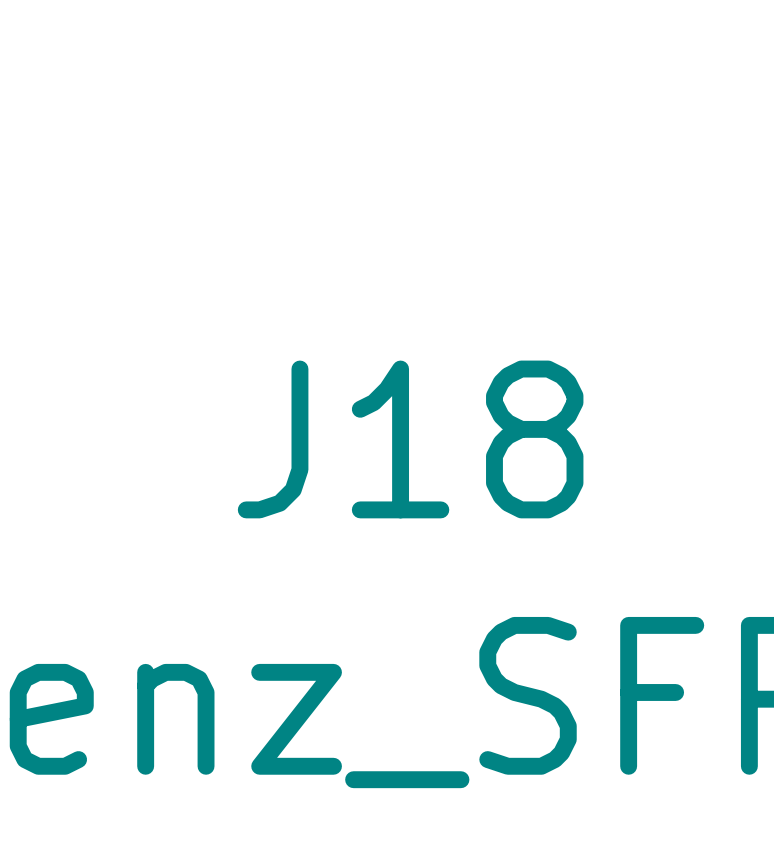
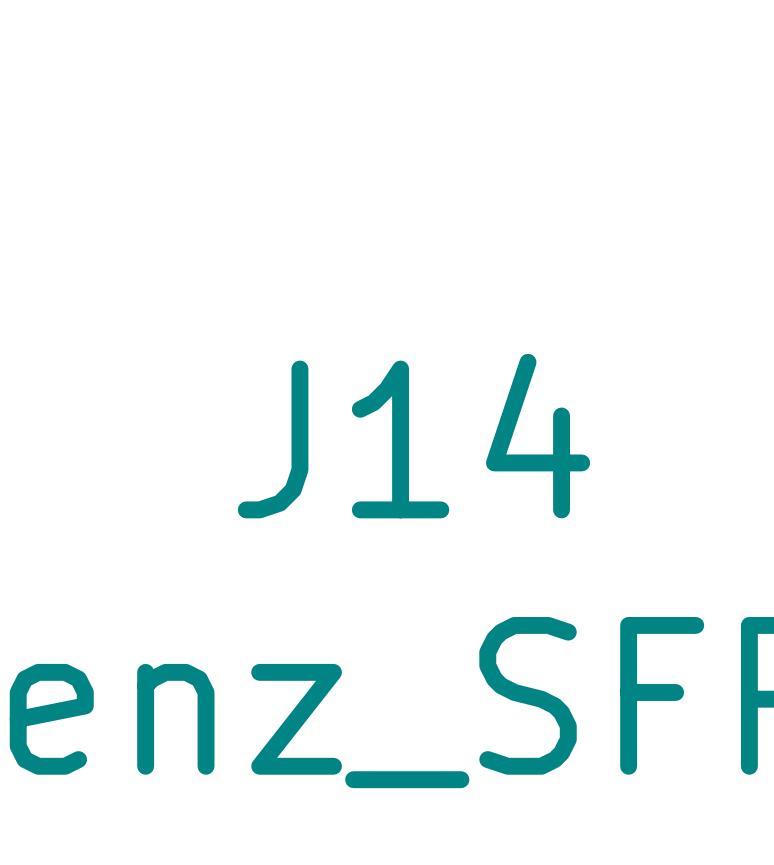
J18 name: J18 (410, 439) -> J14 (413, 436)

